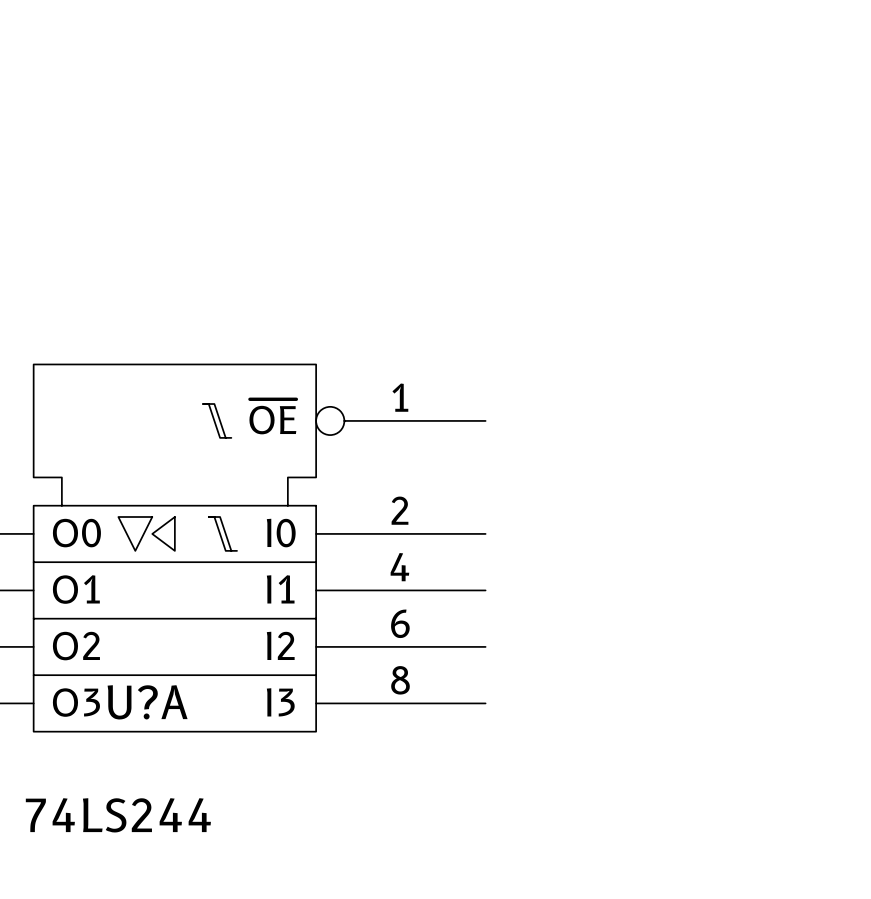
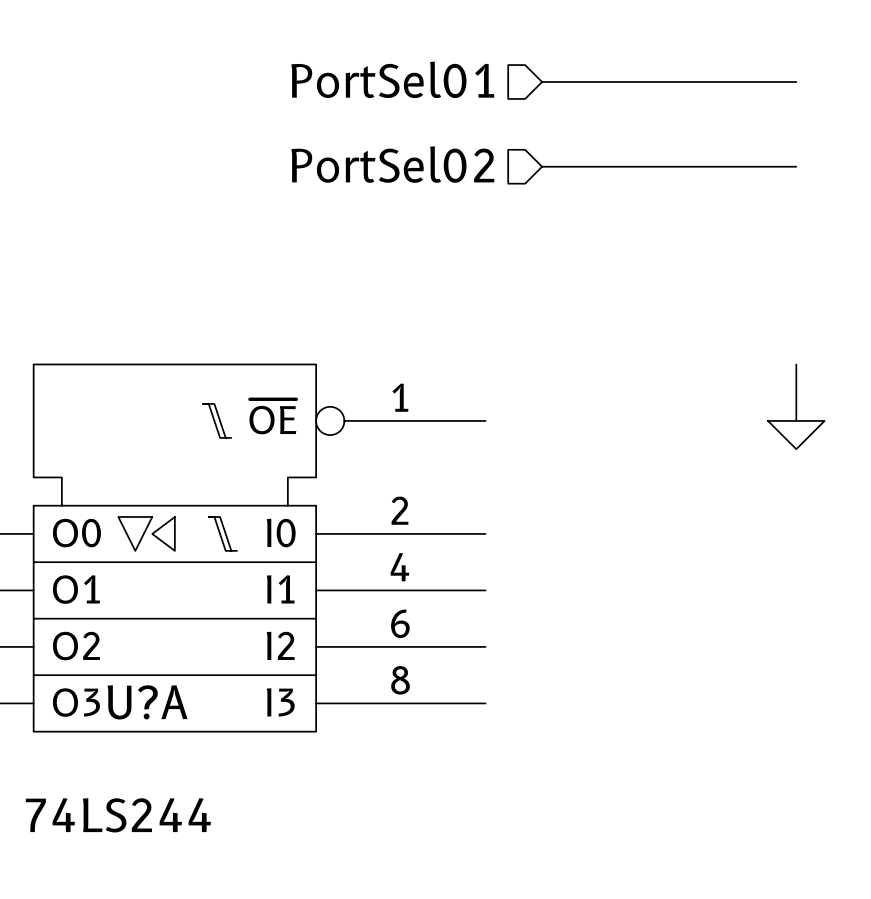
hierarchical label: none -> PortSel01 (392, 79)
wire: none -> (542, 81) (796, 81)
hierarchical label: none -> PortSel02 (392, 164)
wire: none -> (542, 166) (796, 166)
wire: none -> (796, 364) (796, 420)
power symbol: none -> (796, 435)

